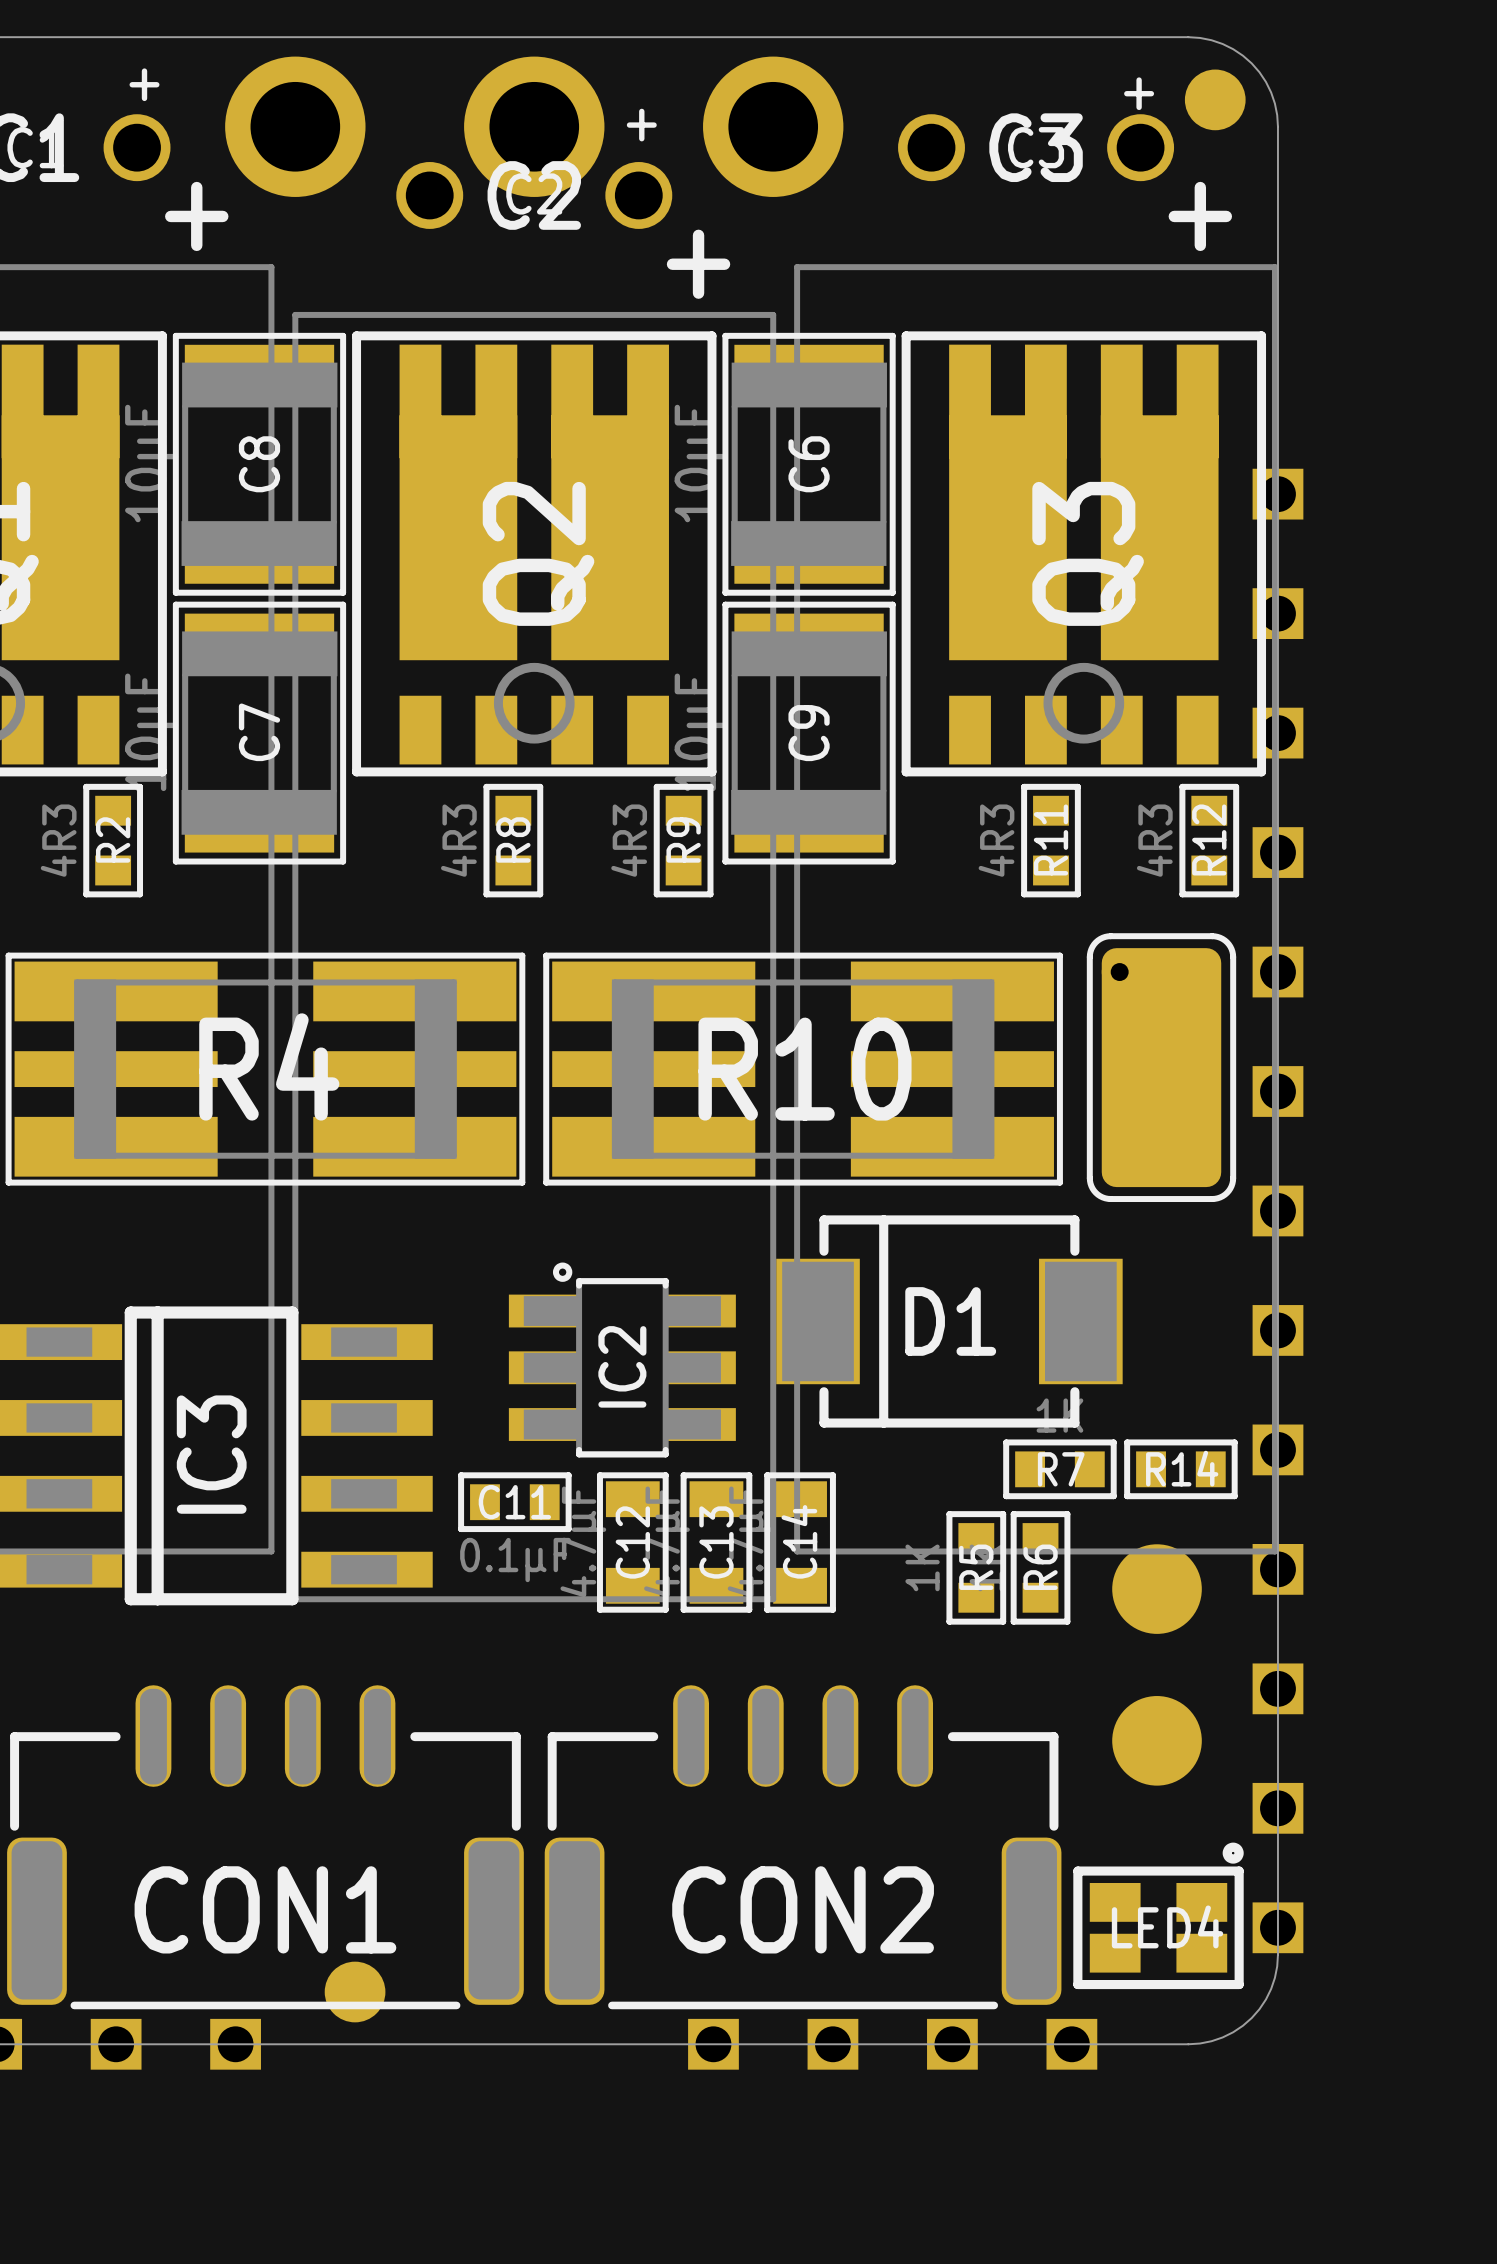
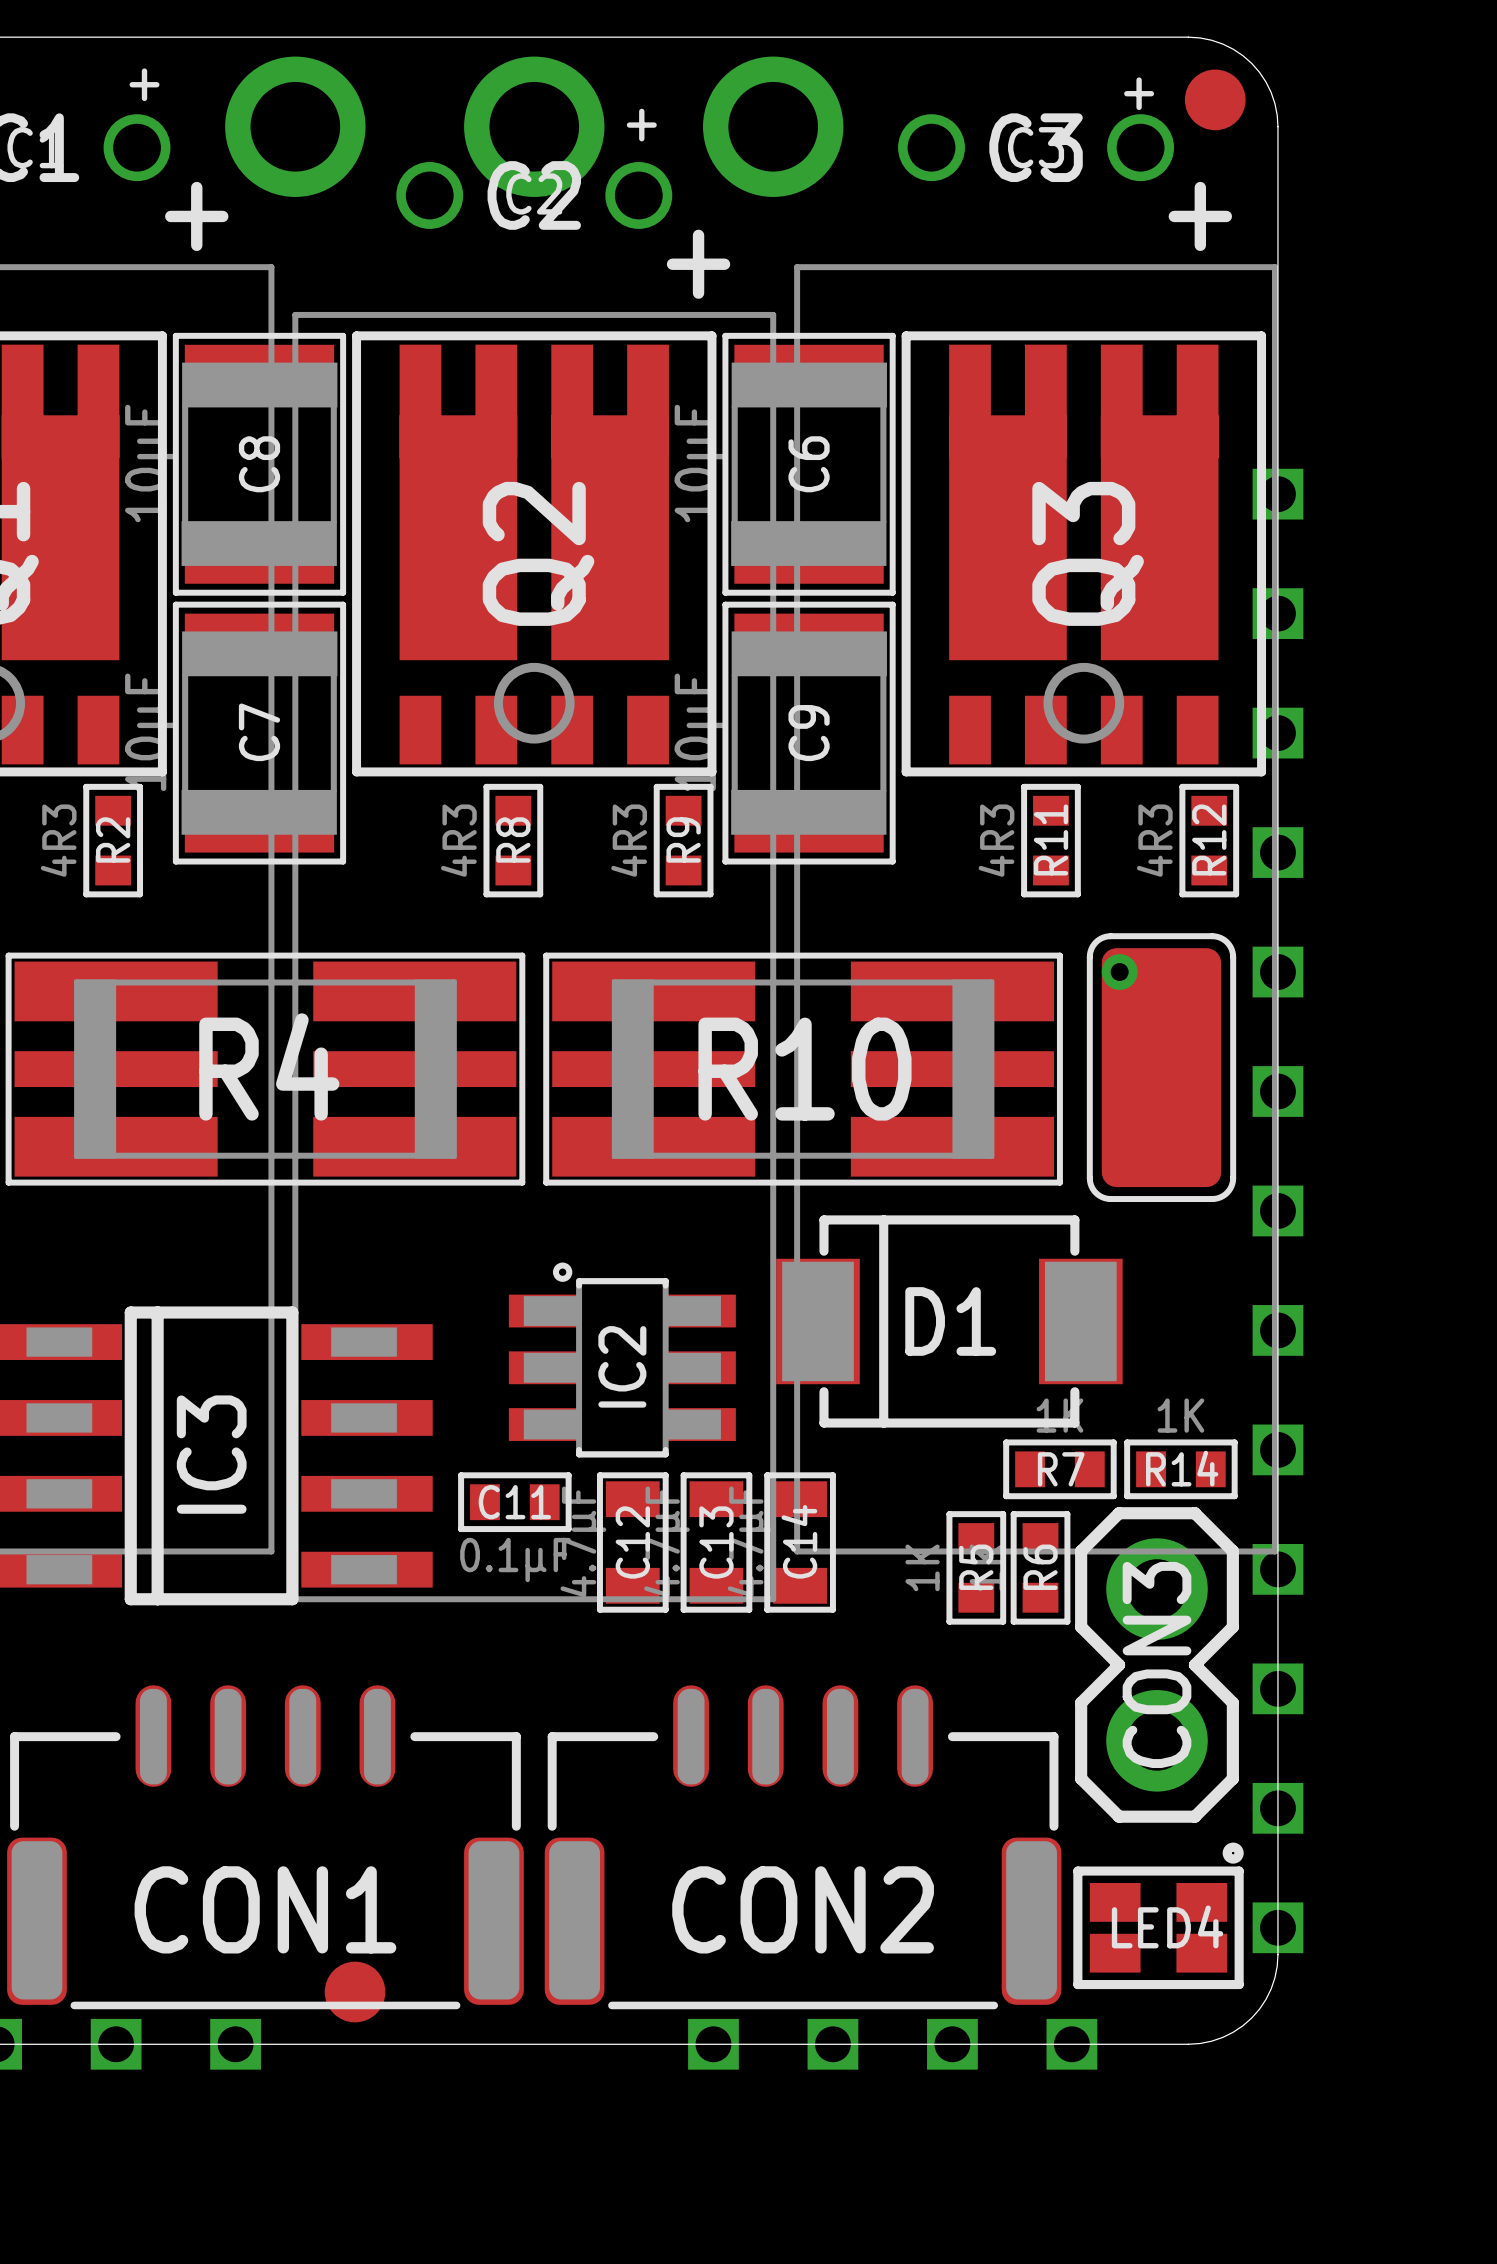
R14 value: none -> 1K (1180, 1415)
part: (1157, 1589) -> none
CON3: none -> (1157, 1664)
part: (1157, 1740) -> none

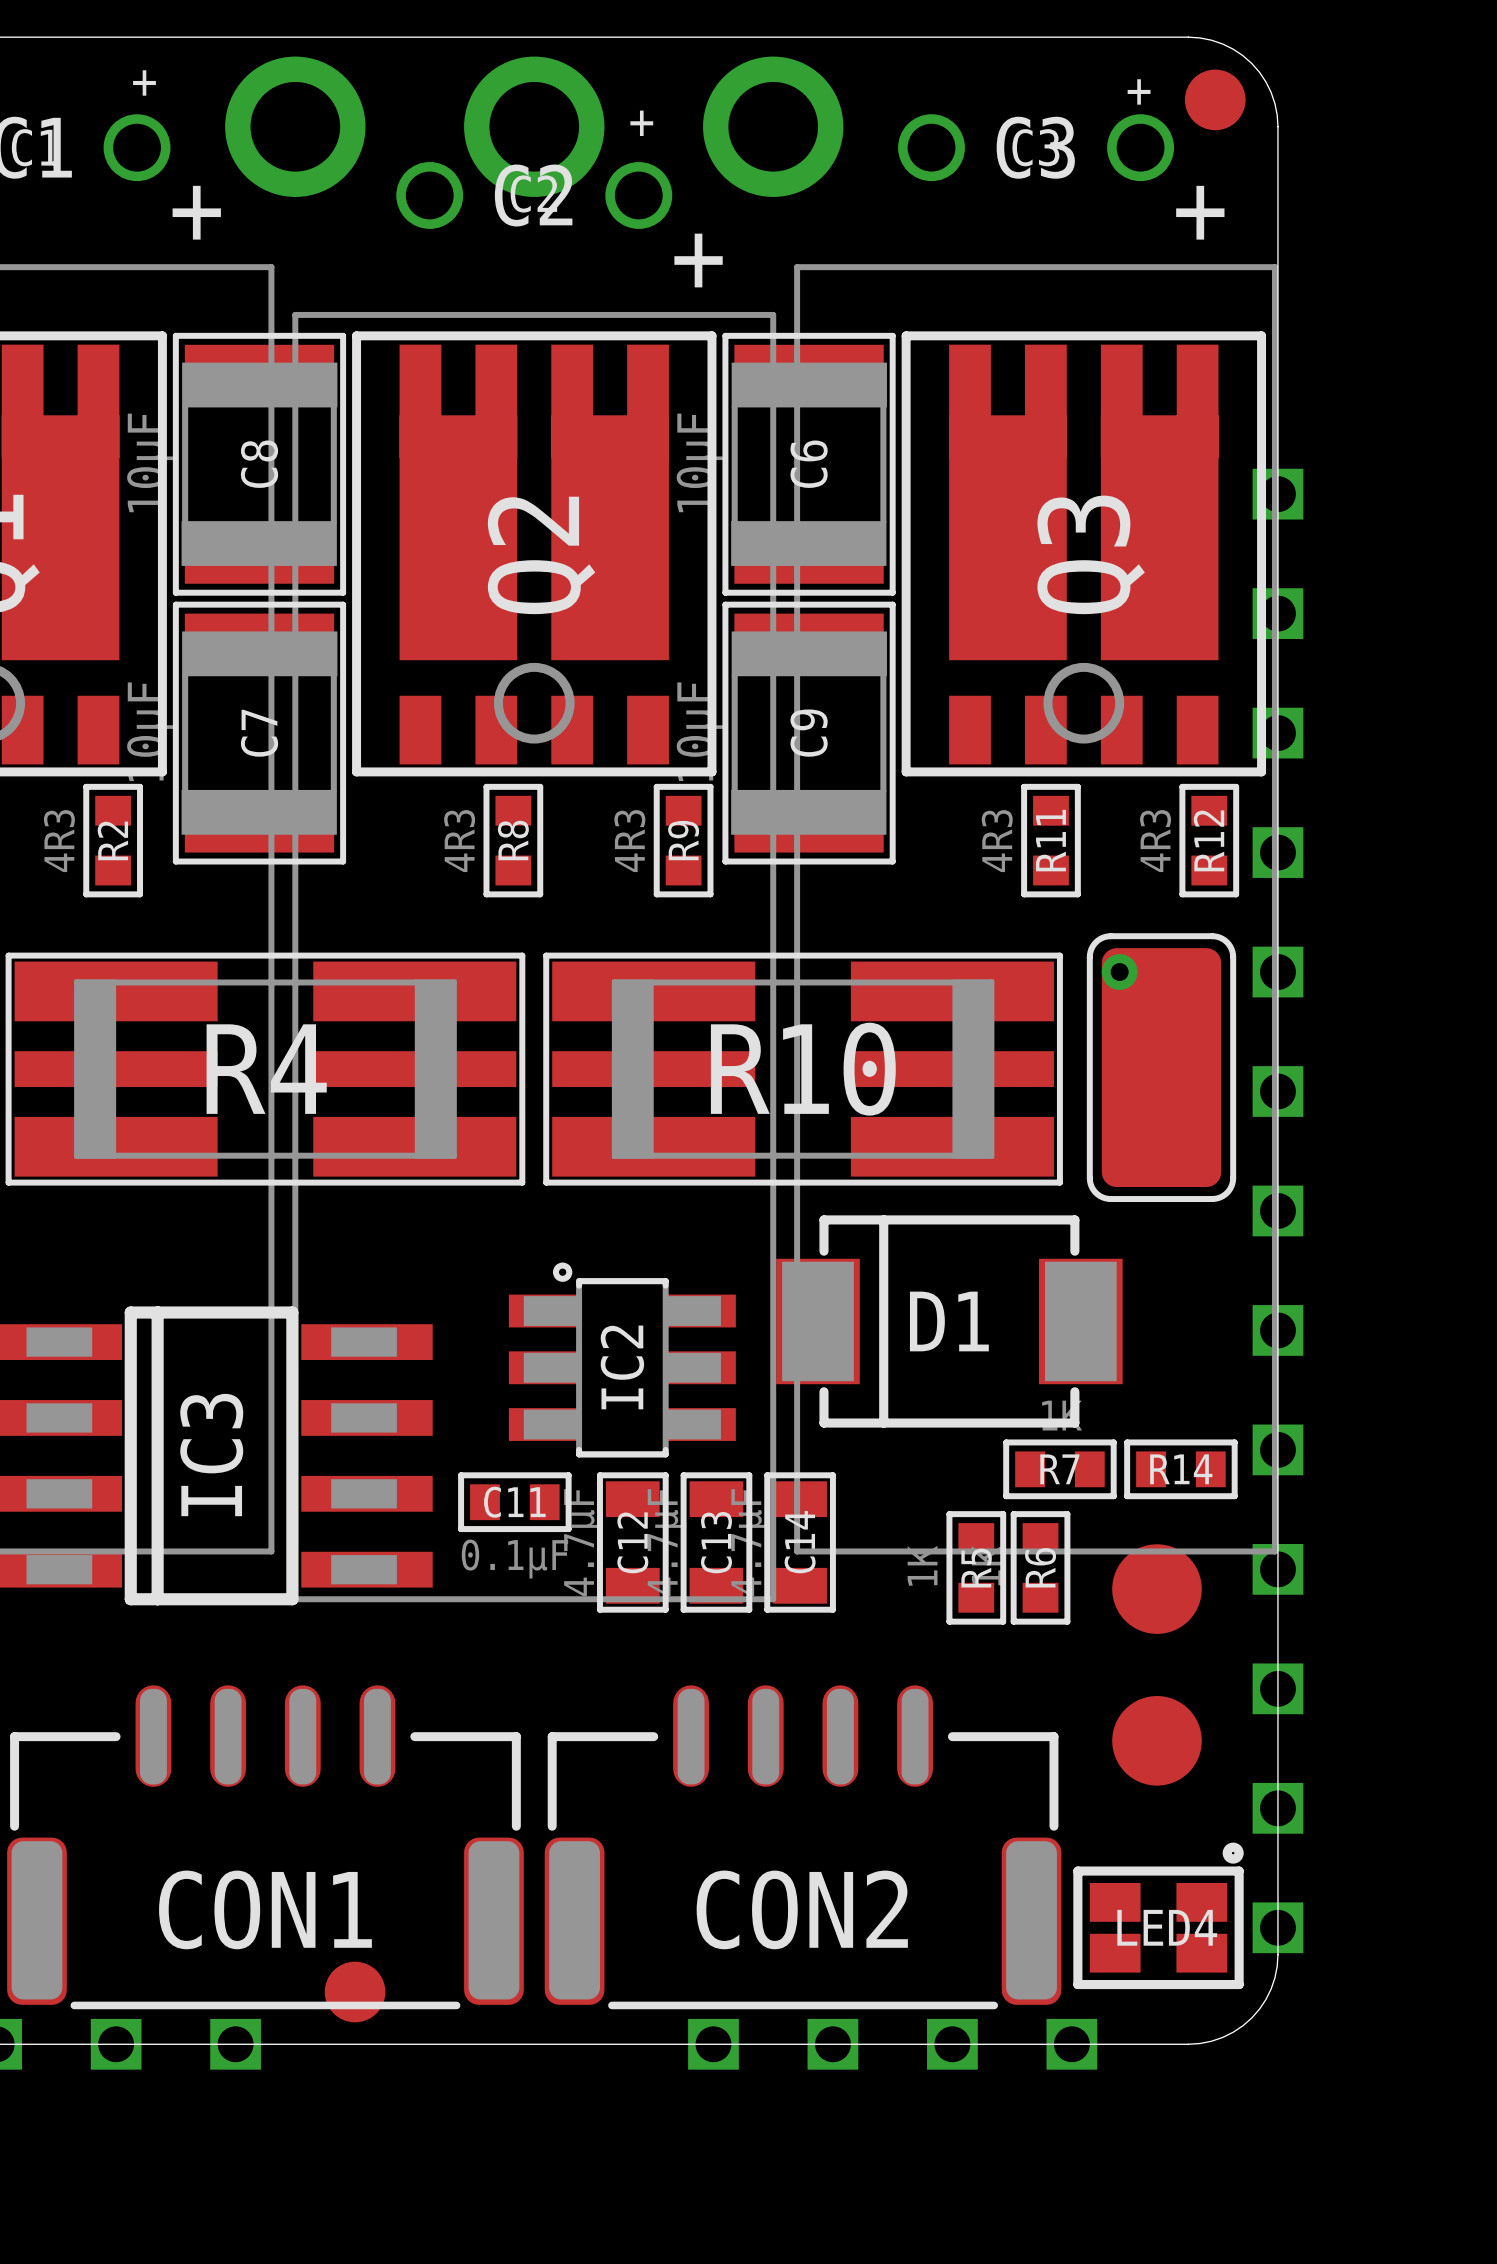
R14 value: 1K (1180, 1415) -> none
part: none -> (1157, 1589)
CON3: (1157, 1664) -> none
part: none -> (1157, 1740)

